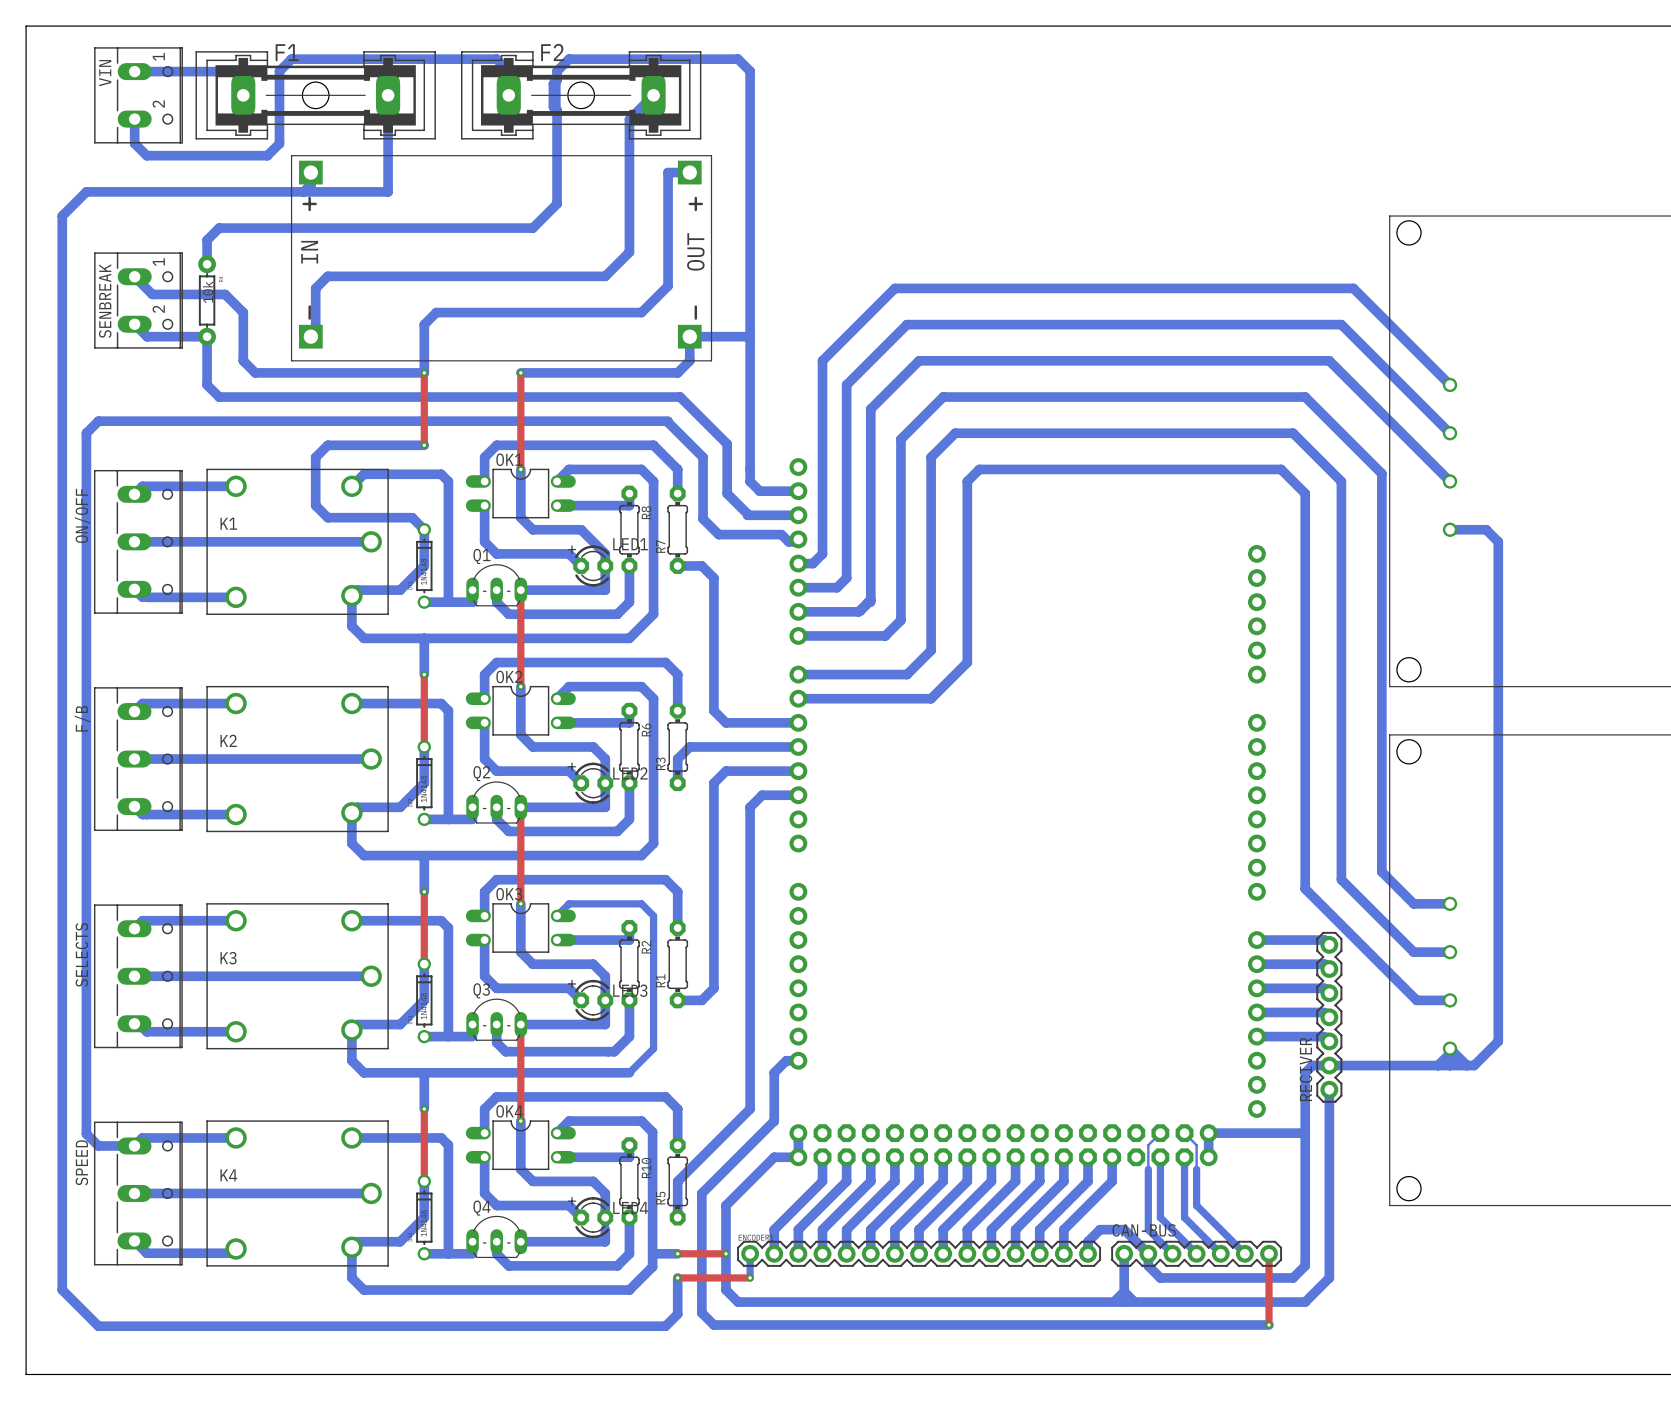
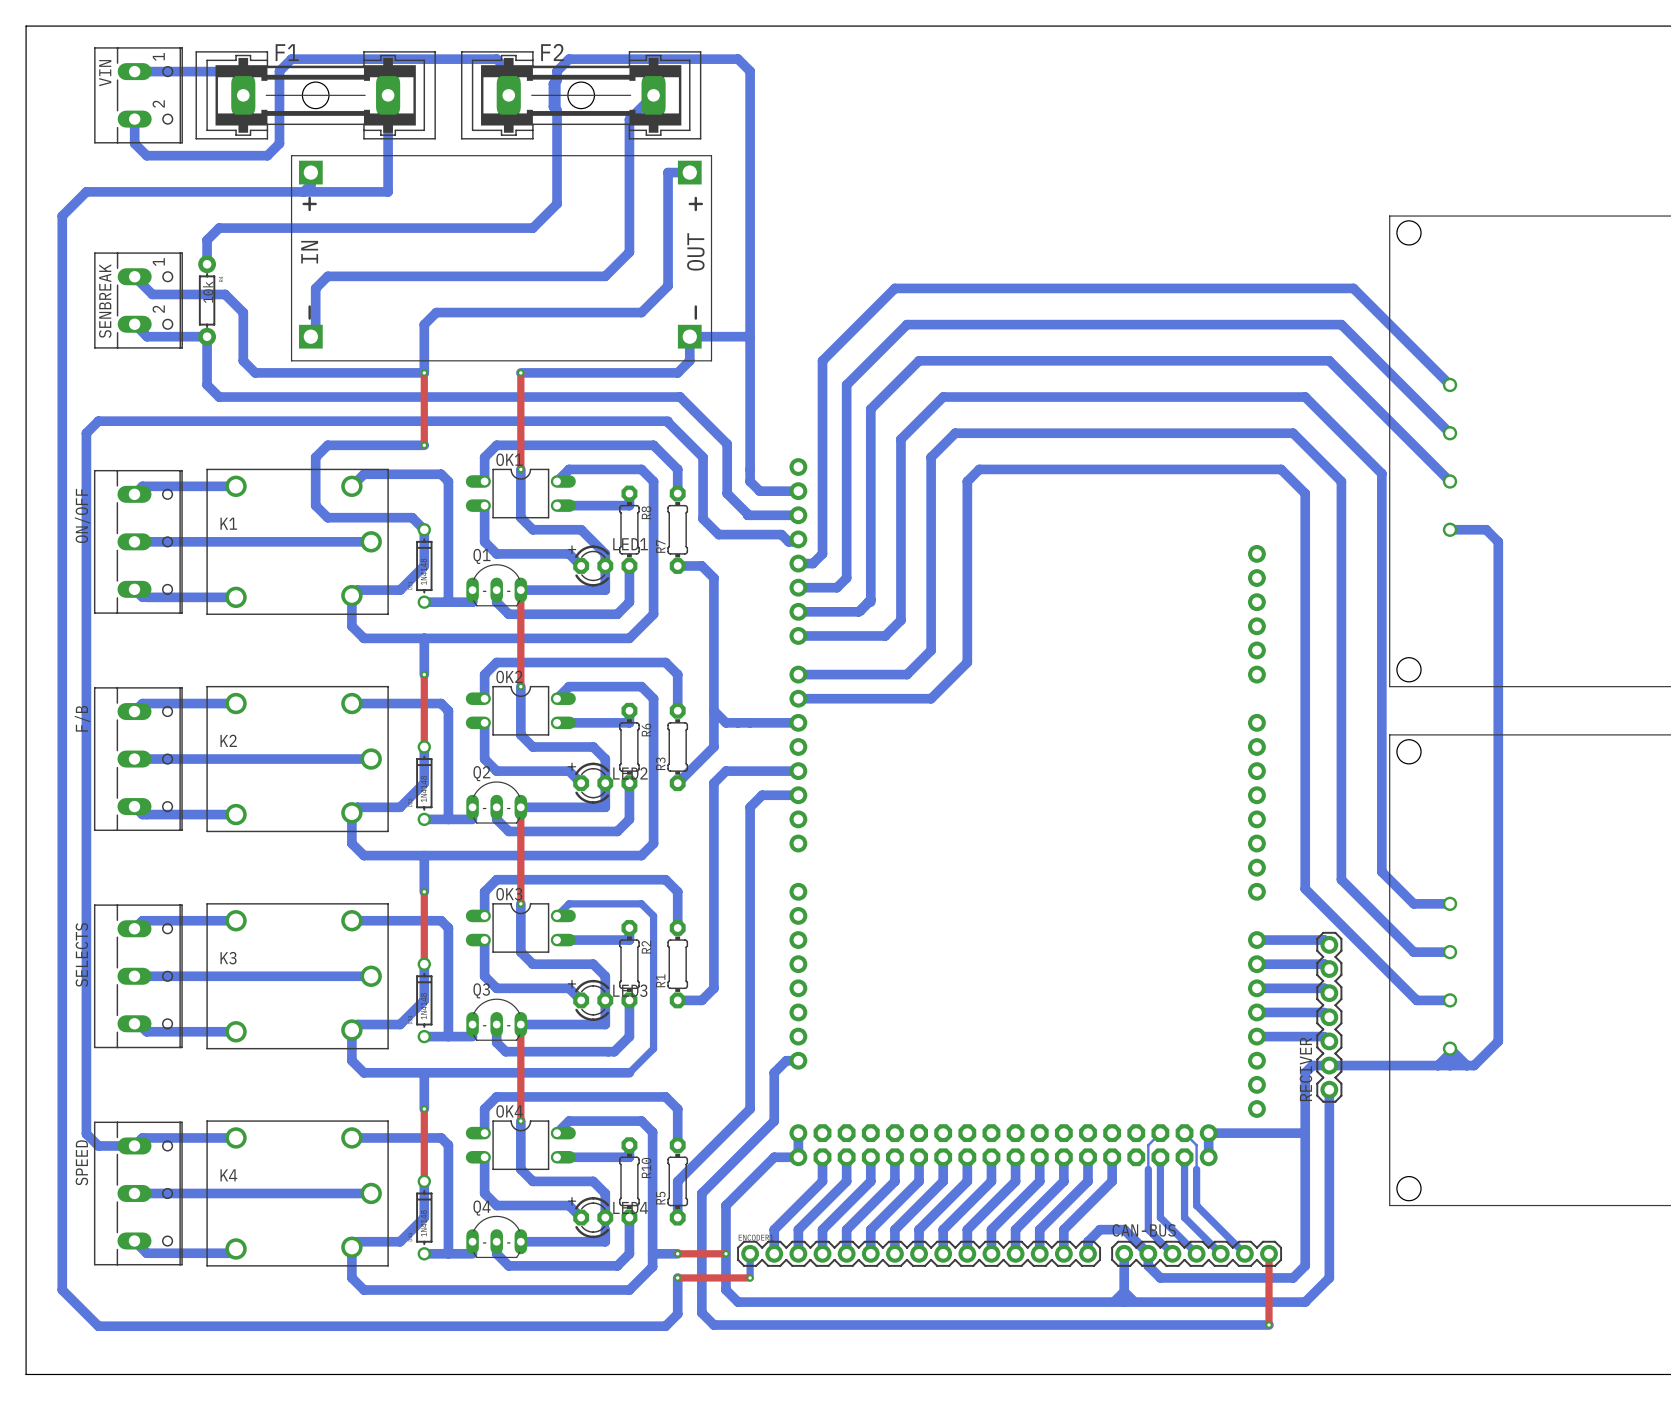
bottom track: (798, 746) (689, 746) (677, 759) (677, 783) -> (713, 710) (713, 746) (677, 783)

